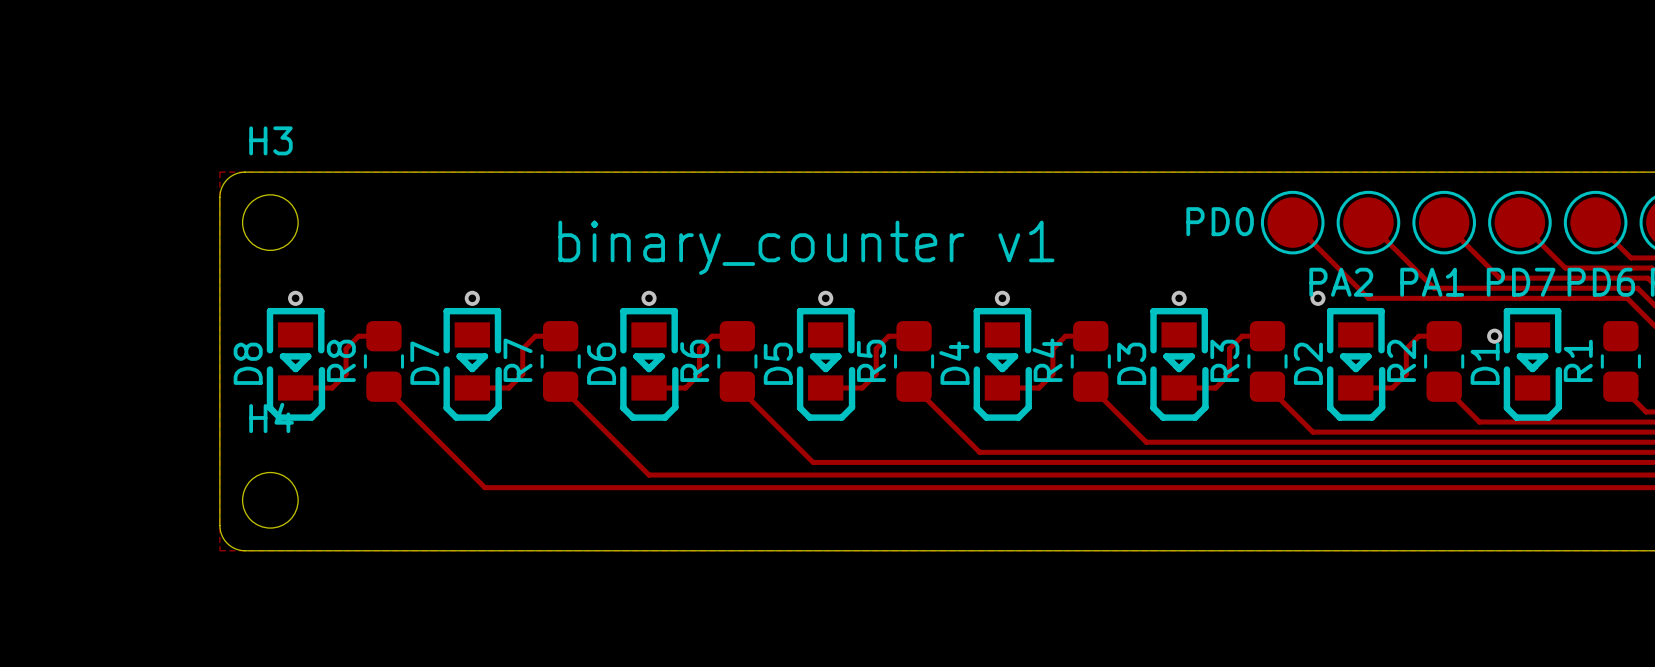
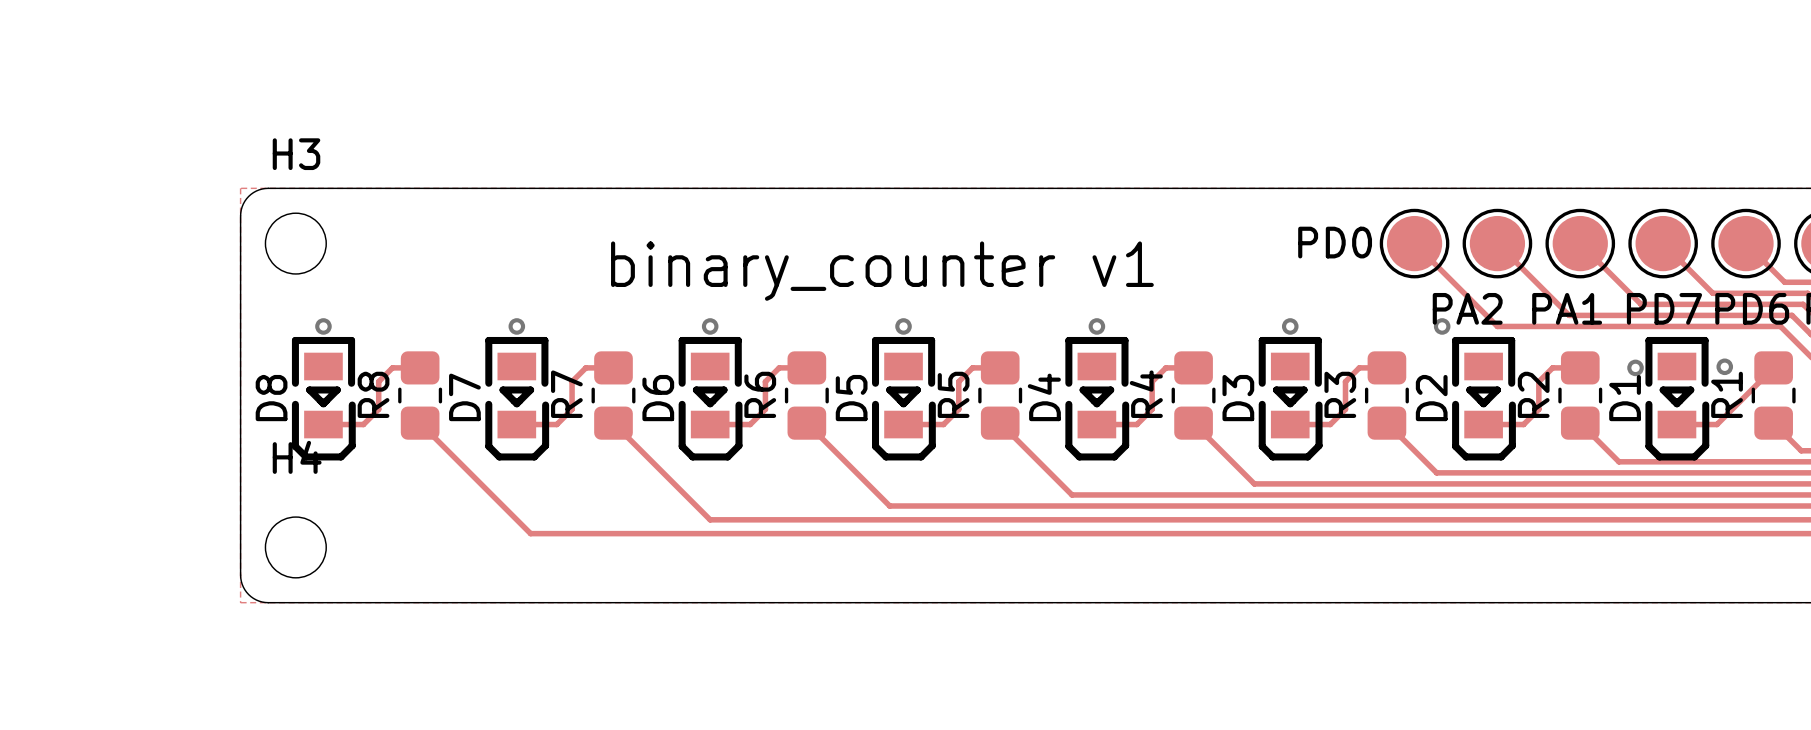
via: none -> (1724, 366)
track: none -> (1773, 367) (1717, 424) (1676, 424)

